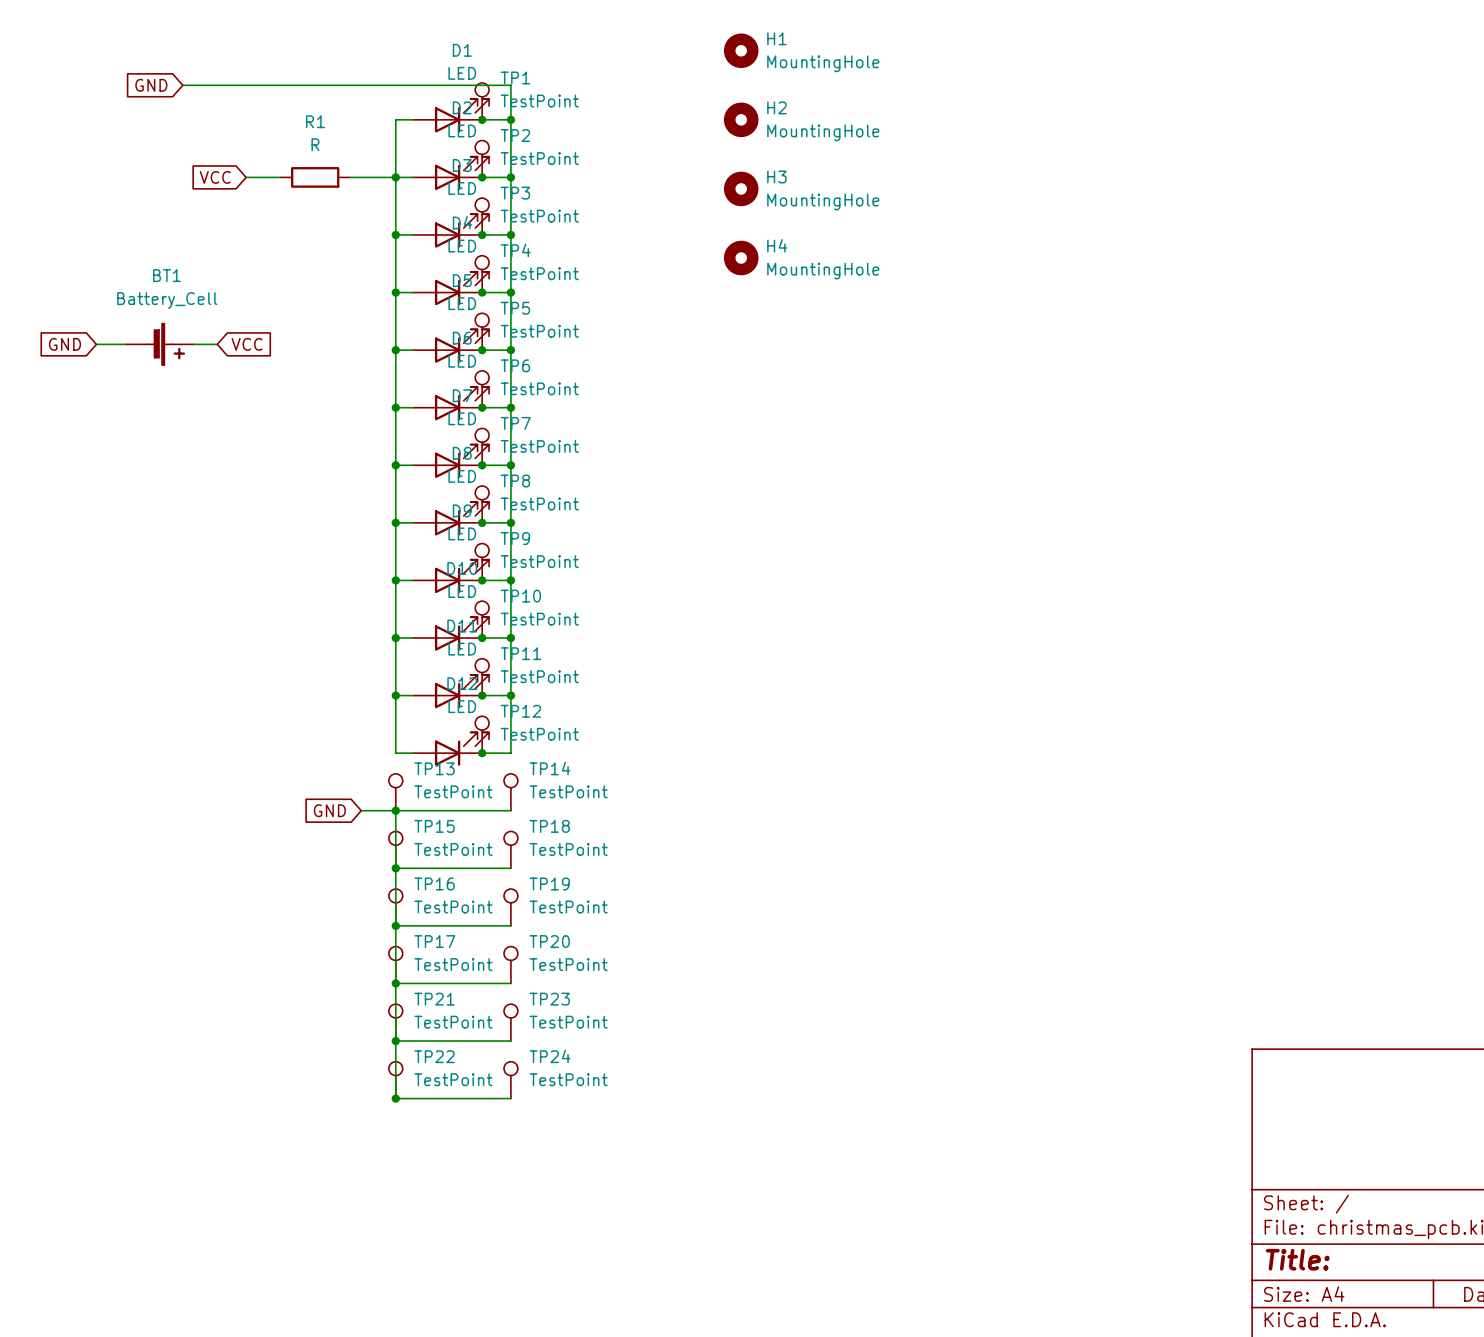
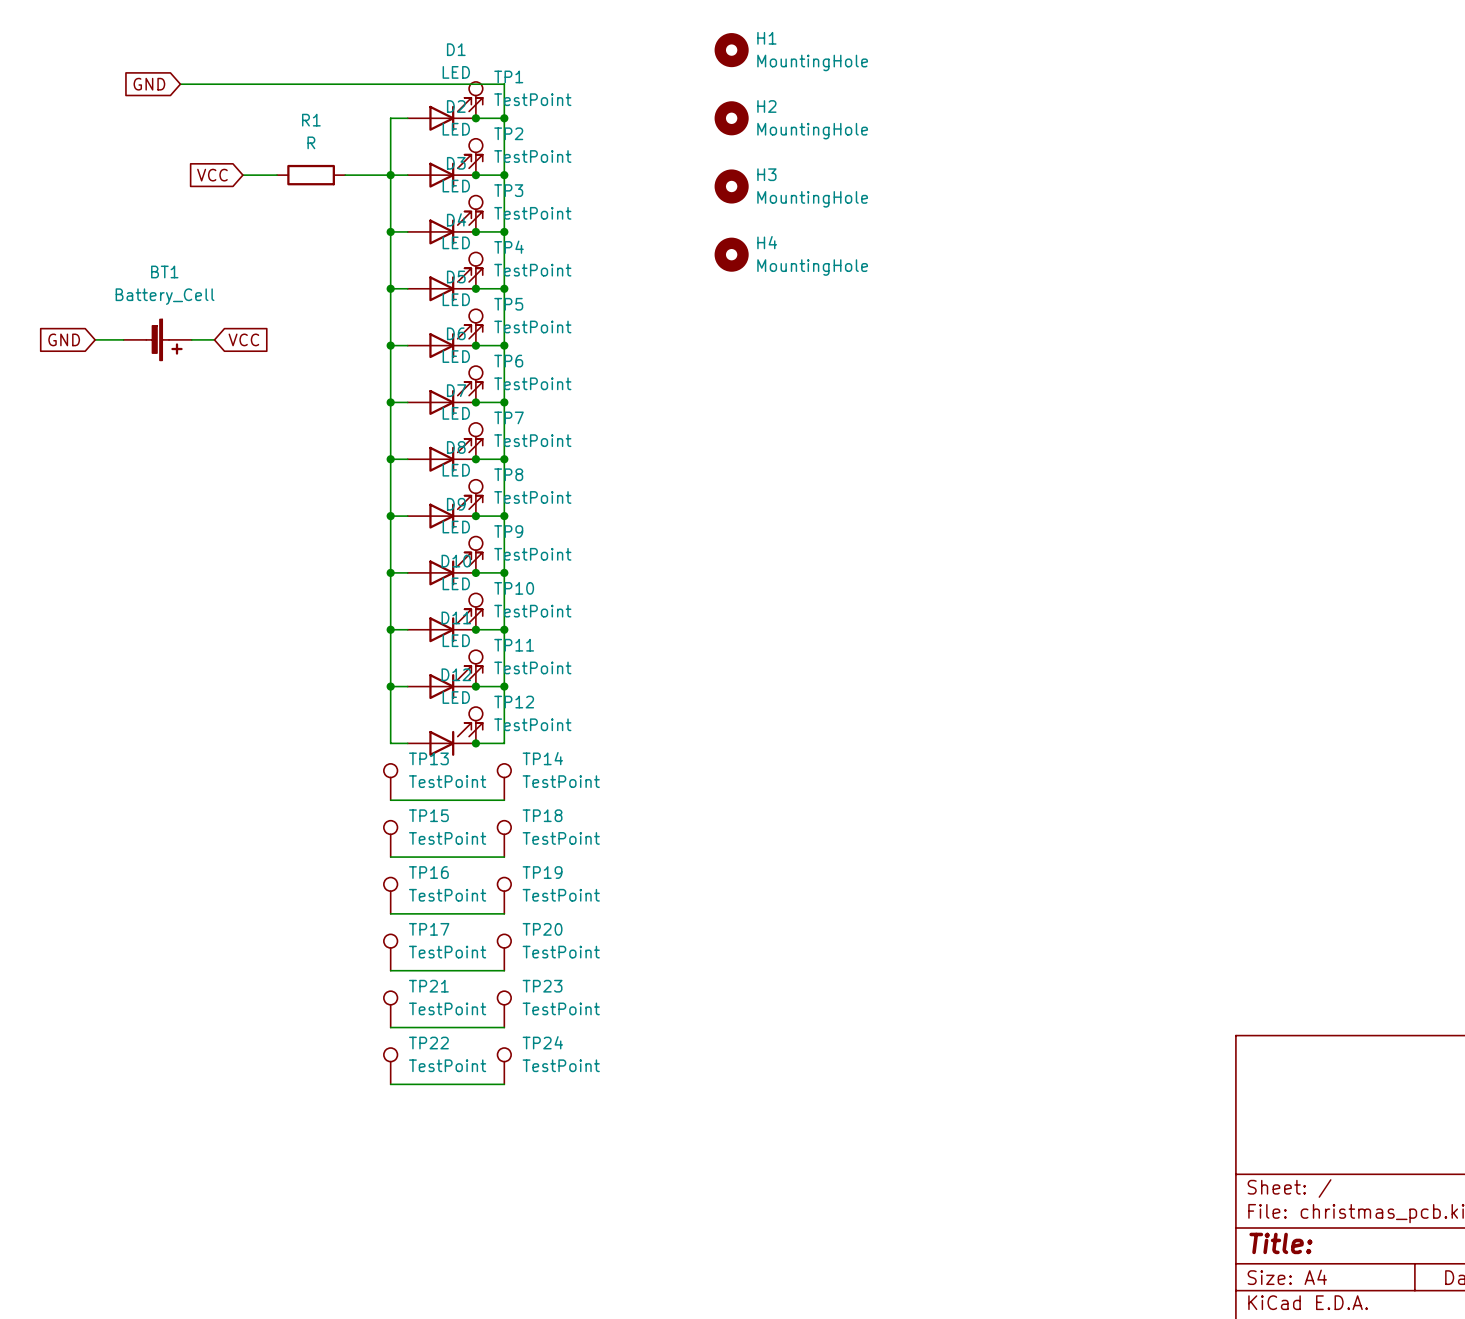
global label: GND (329, 810) -> none
wire: (361, 810) (395, 810) (395, 1098) -> none
junction: (395, 810) -> none
junction: (395, 868) -> none
junction: (395, 925) -> none
junction: (395, 983) -> none
junction: (395, 1041) -> none
junction: (395, 1098) -> none

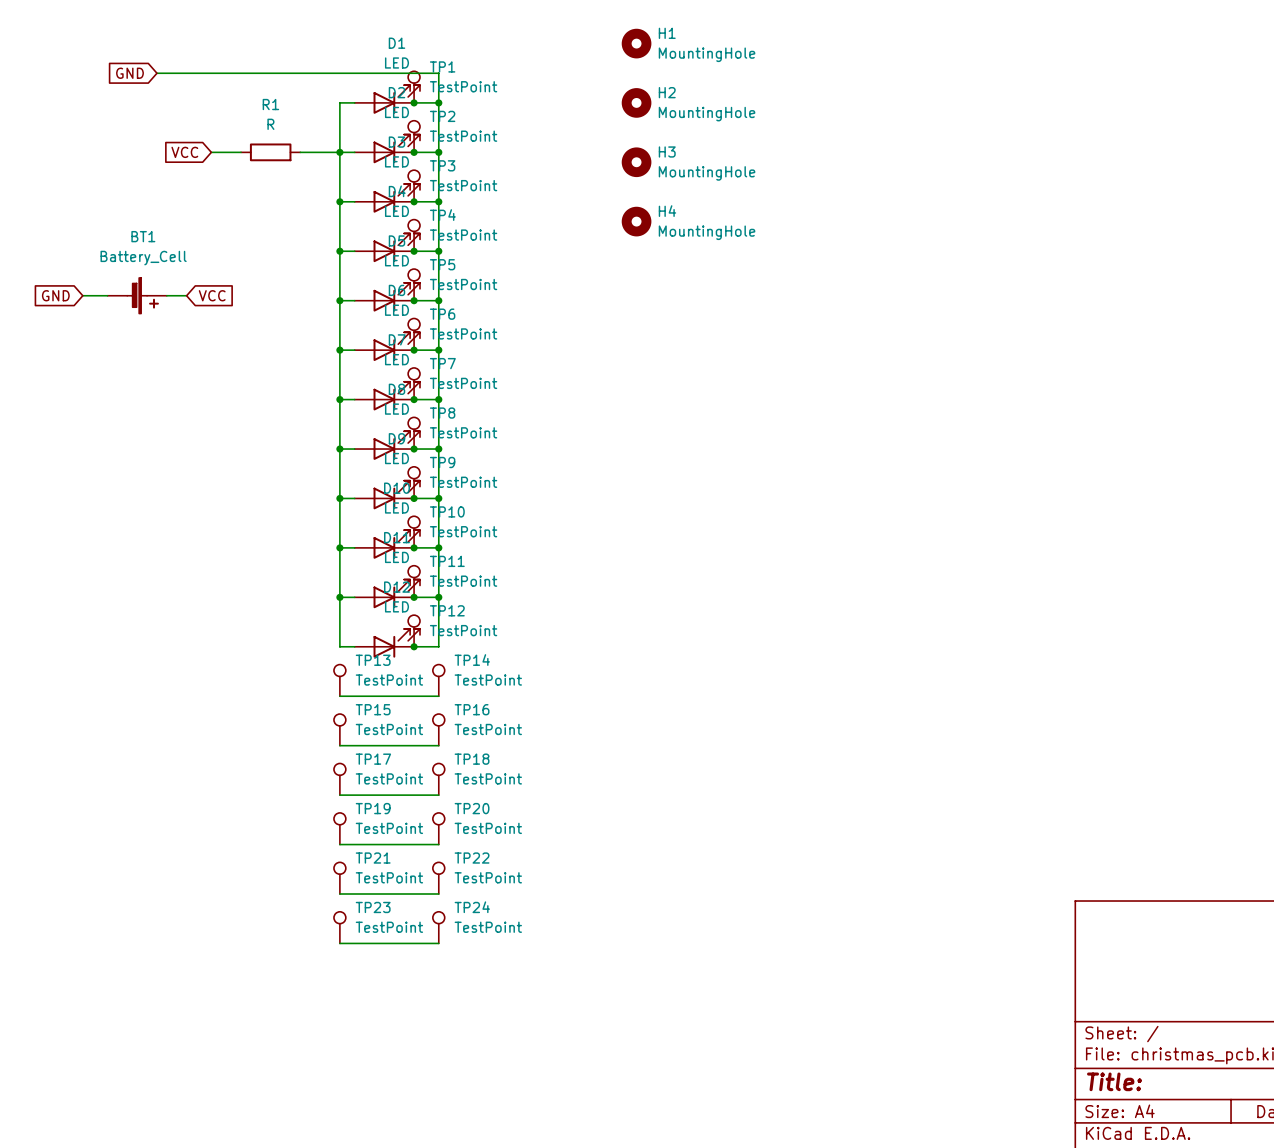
TP18 name: TP18 (542, 815) -> TP16 (472, 709)
TP16 name: TP16 (428, 872) -> TP17 (373, 759)
TP19 name: TP19 (542, 872) -> TP18 (472, 759)
TP17 name: TP17 (429, 929) -> TP19 (373, 808)
TP23 name: TP23 (542, 986) -> TP22 (472, 858)
TP22 name: TP22 (428, 1043) -> TP23 (373, 907)

